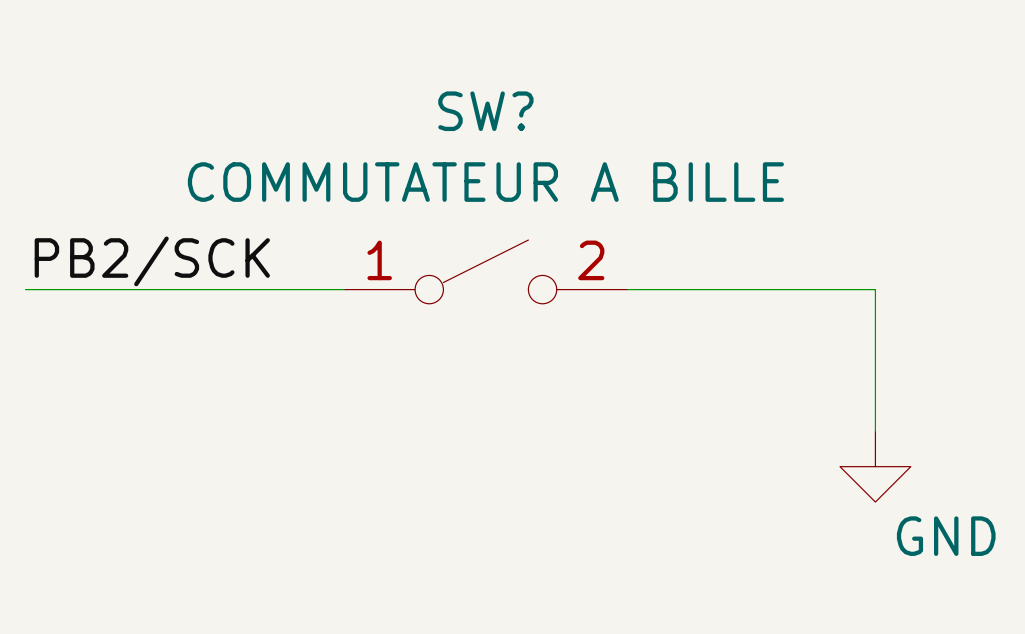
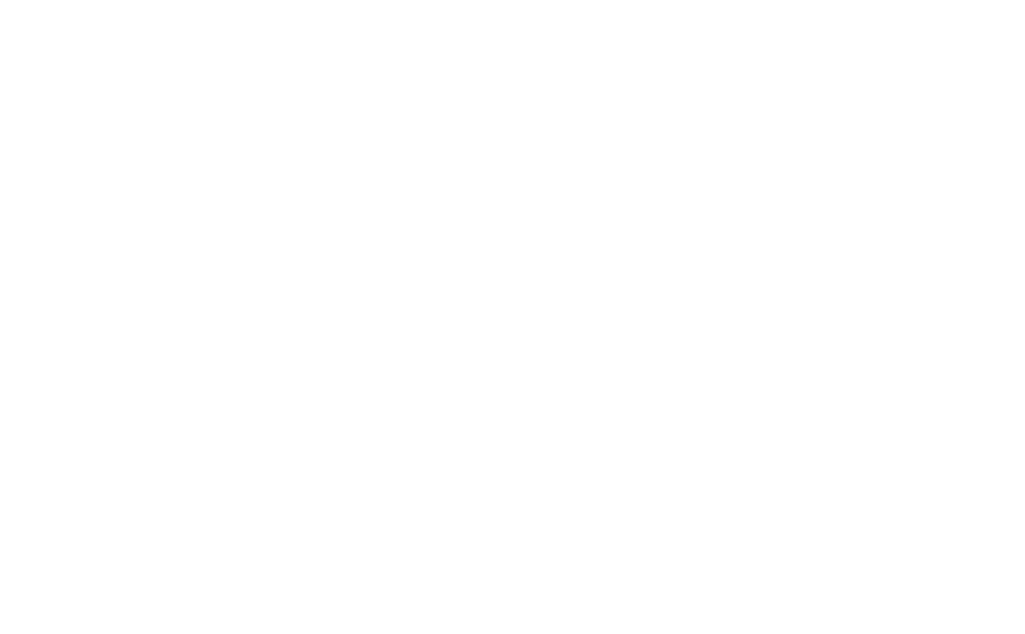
label: PB2/SCK (152, 261) -> none
SW?: COMMUTATEUR A BILLE (485, 271) -> none
wire: (25, 289) (344, 289) -> none
wire: (627, 289) (875, 289) (875, 431) -> none
power symbol: GND (875, 466) -> none

